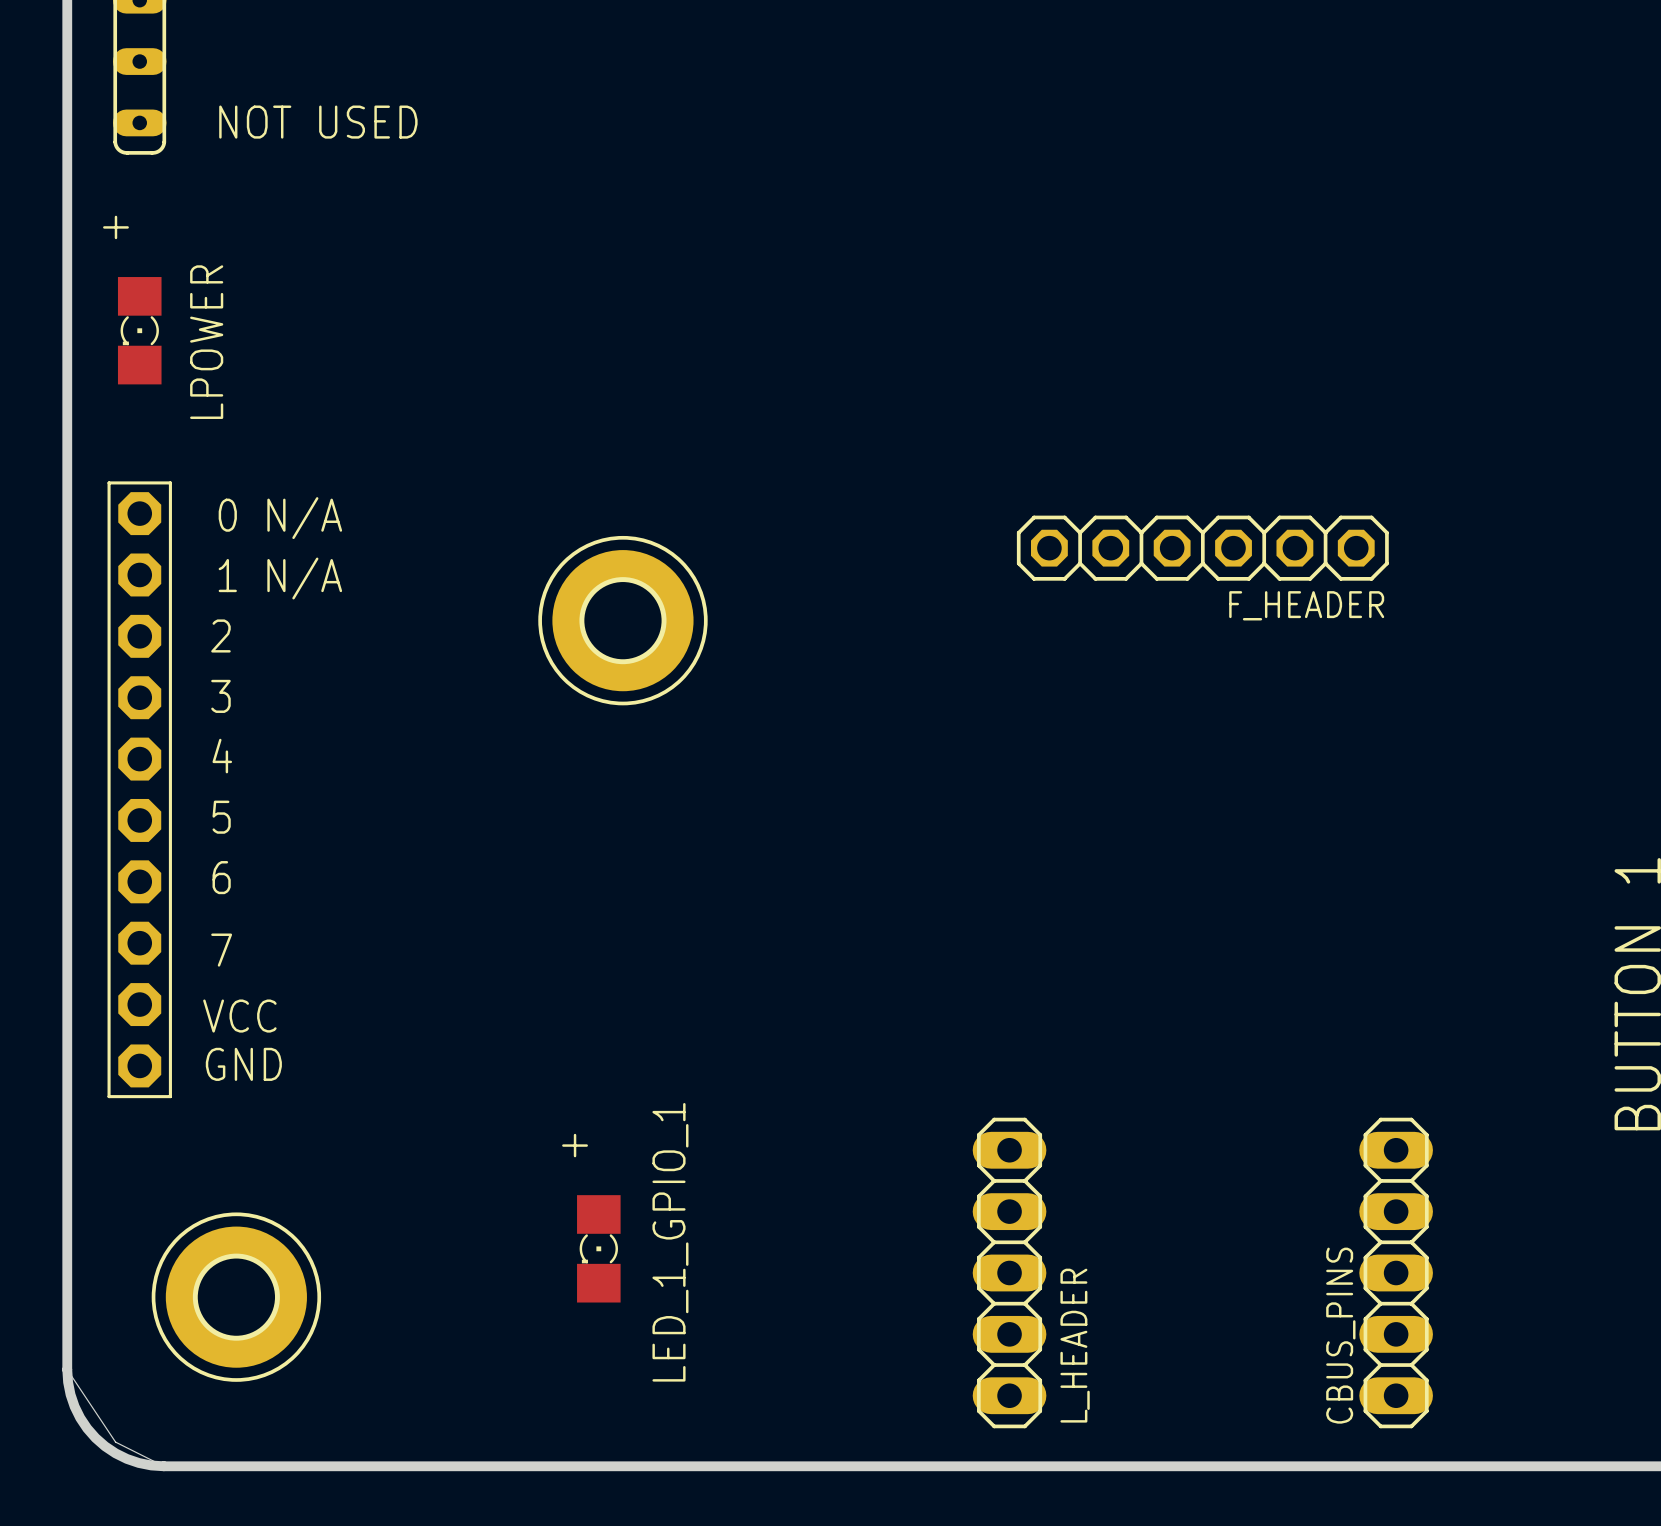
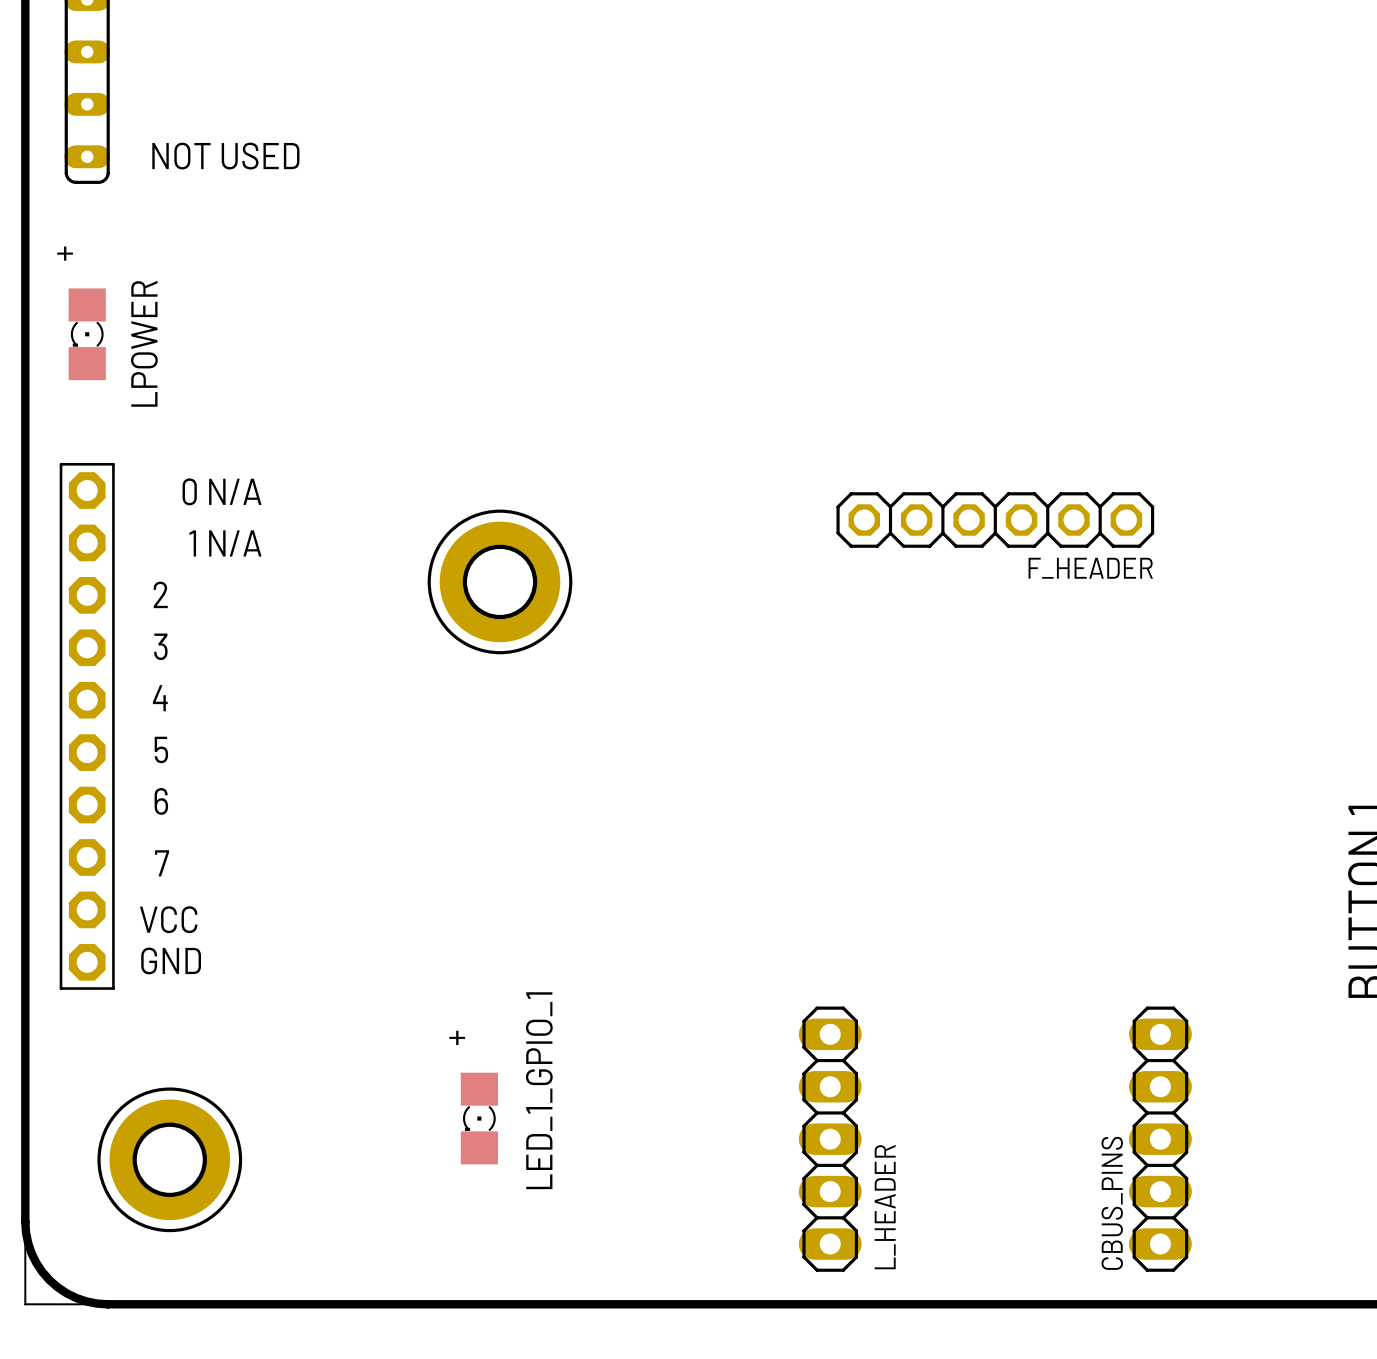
board edge: (67, 1369) (115, 1442) (163, 1466) -> (25, 1221) (25, 1304) (107, 1304)

